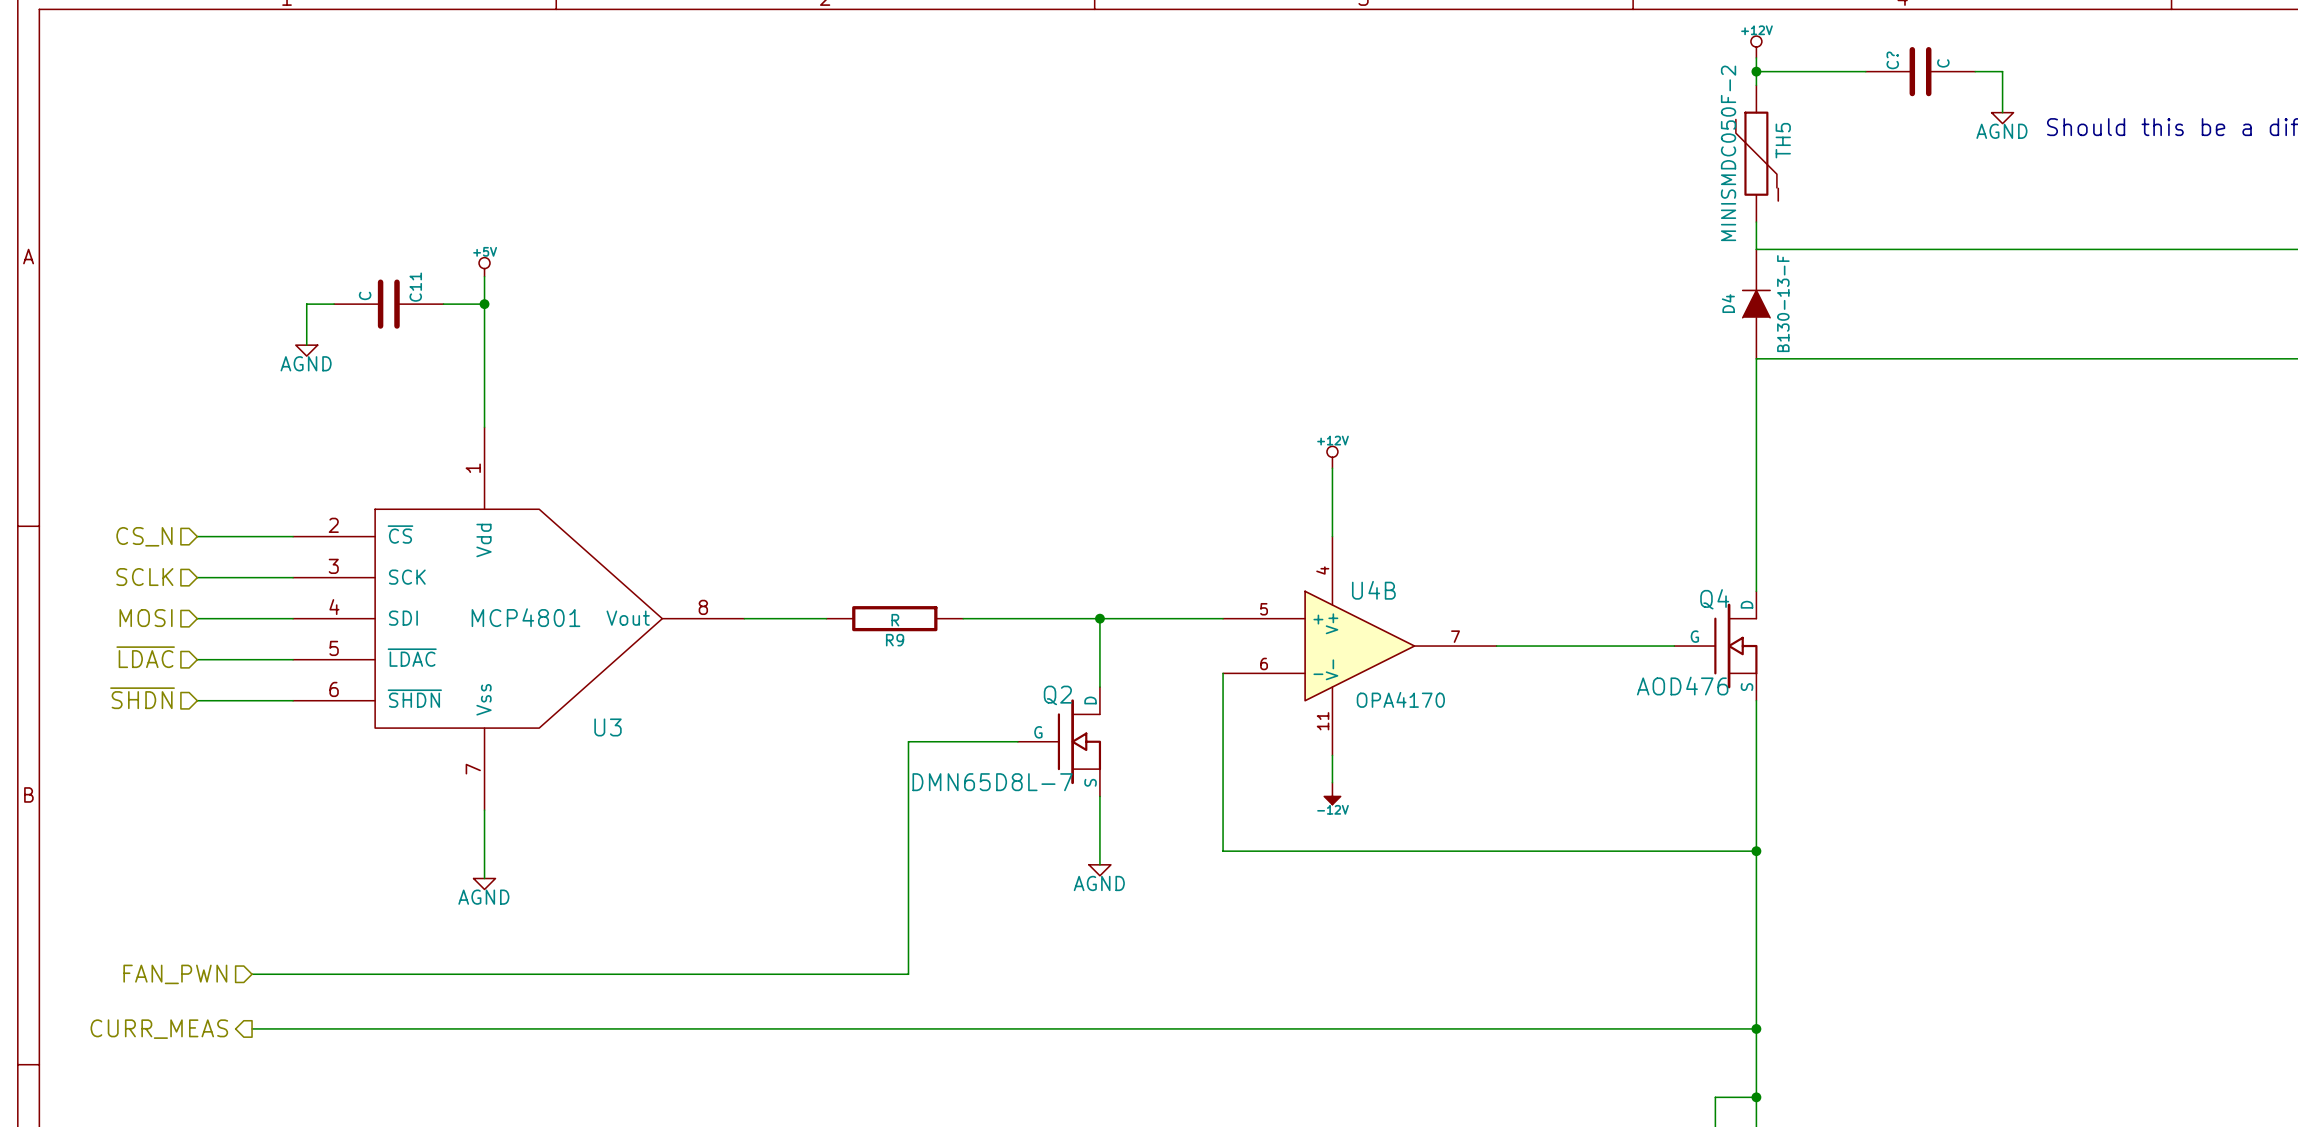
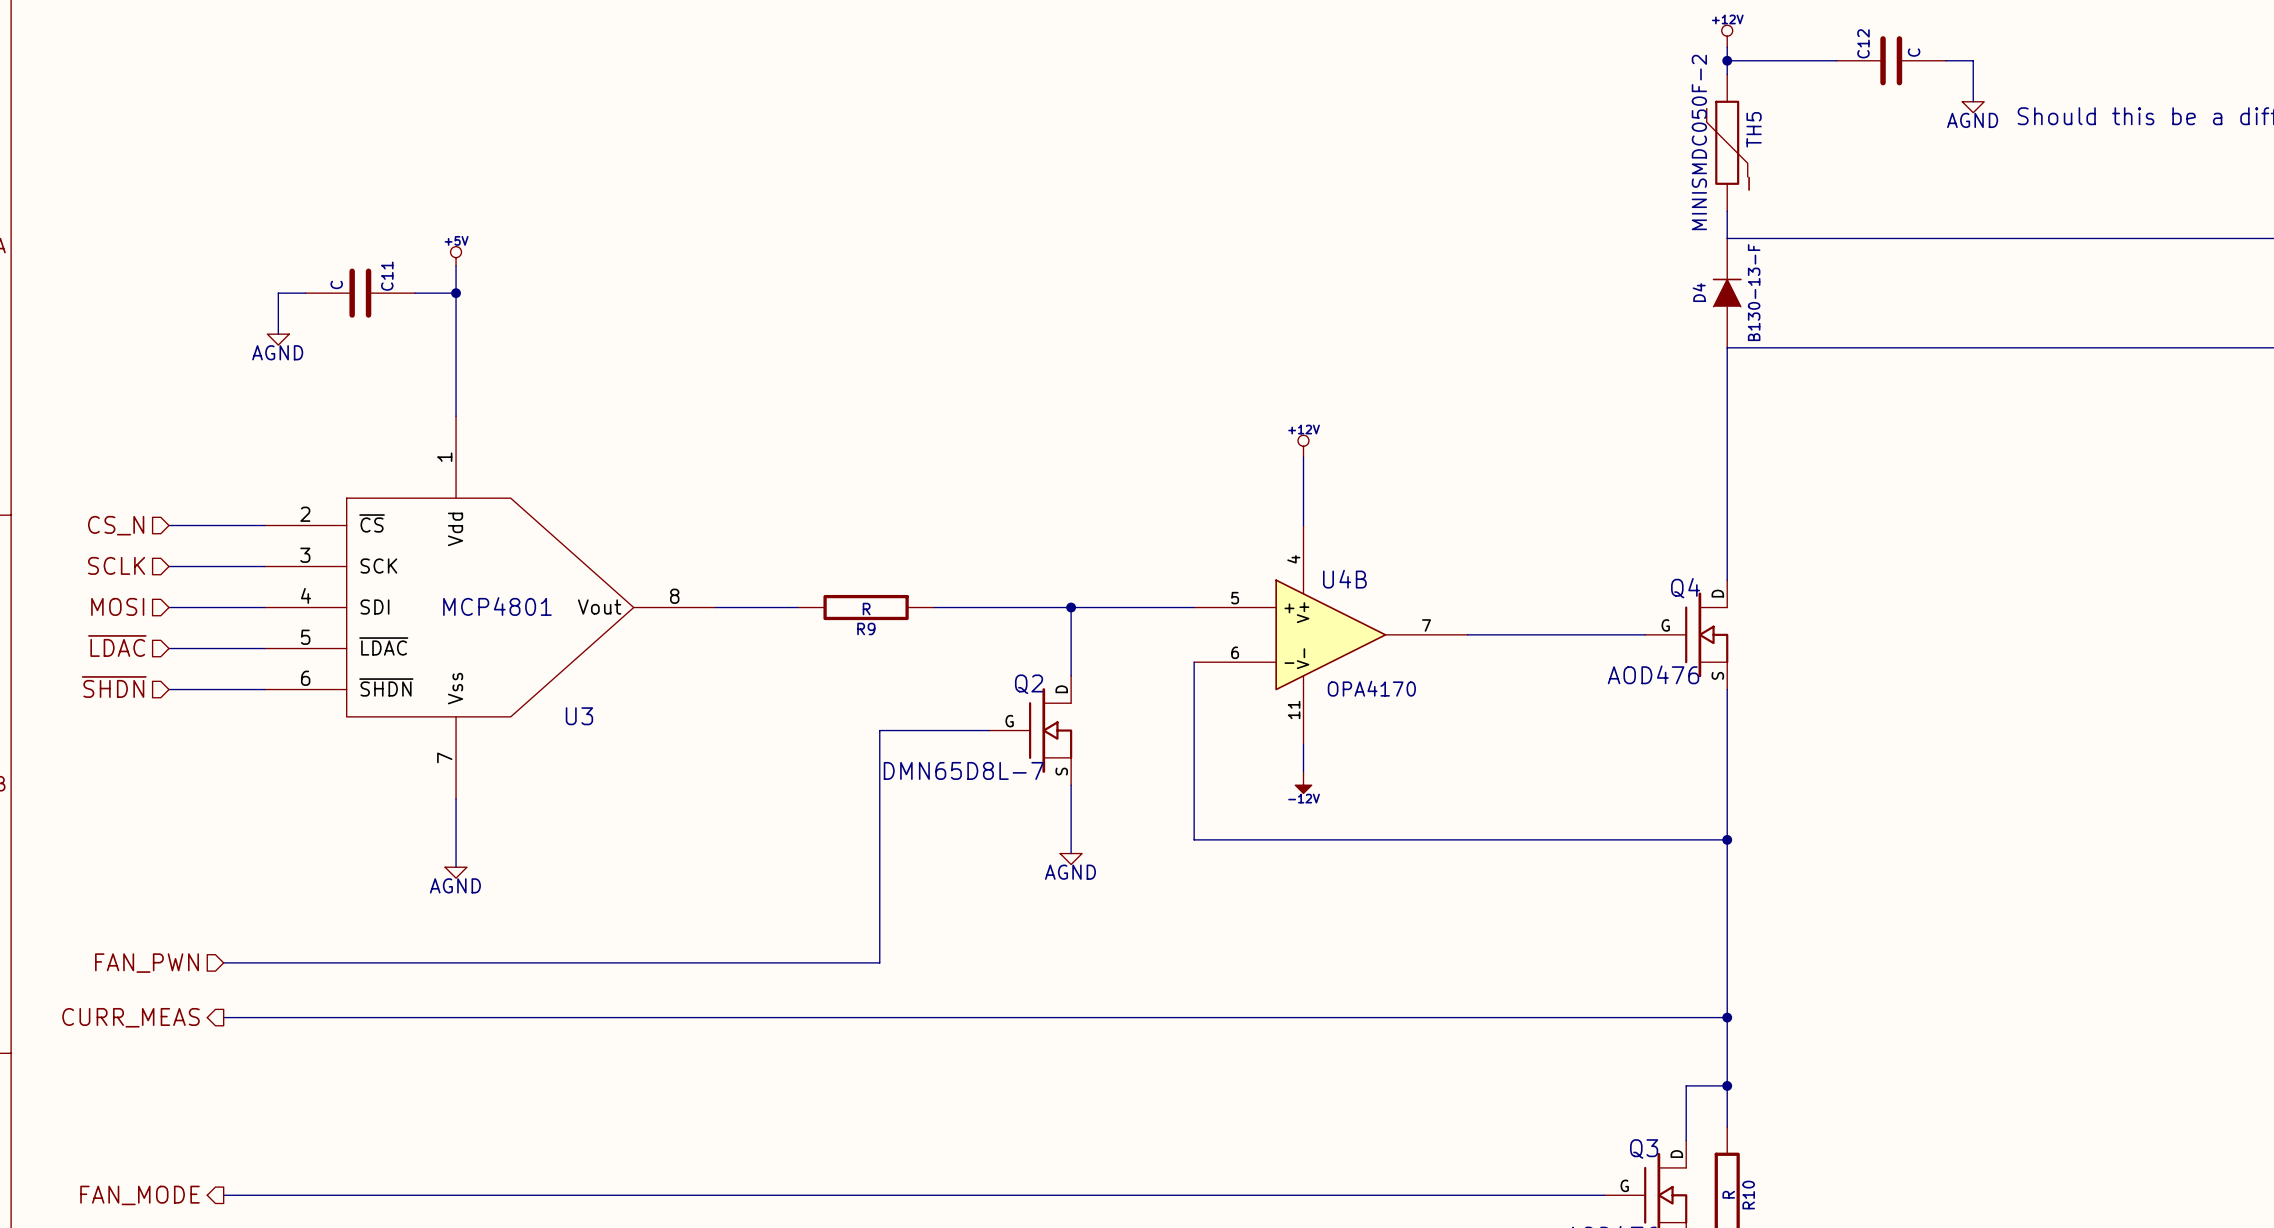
C? name: C? (1892, 60) -> C12 (1863, 43)

